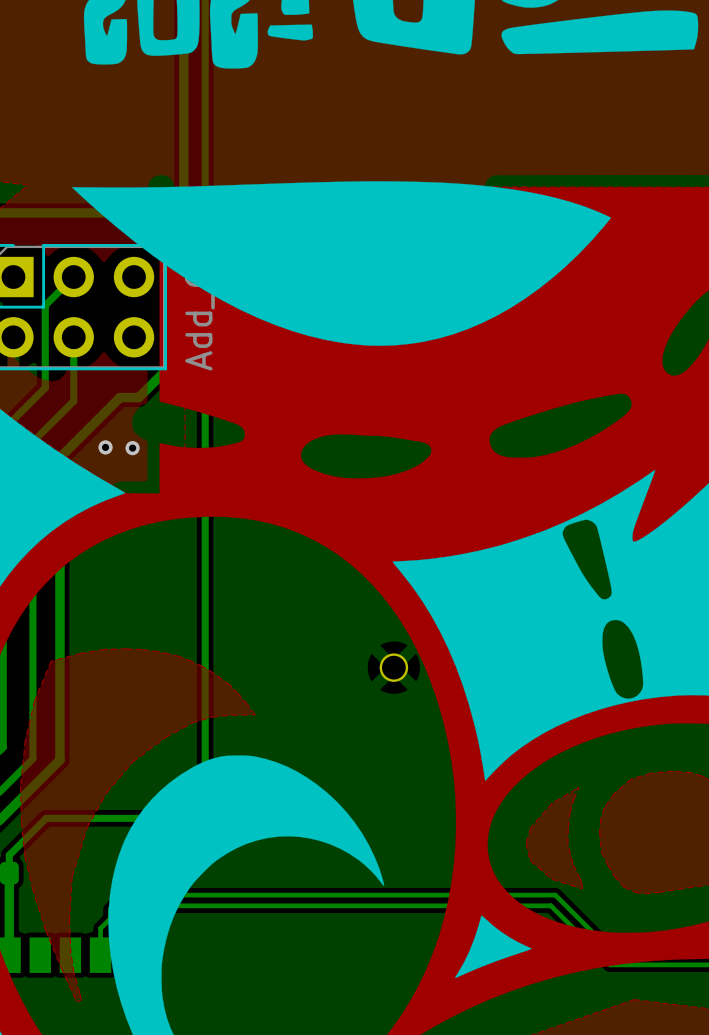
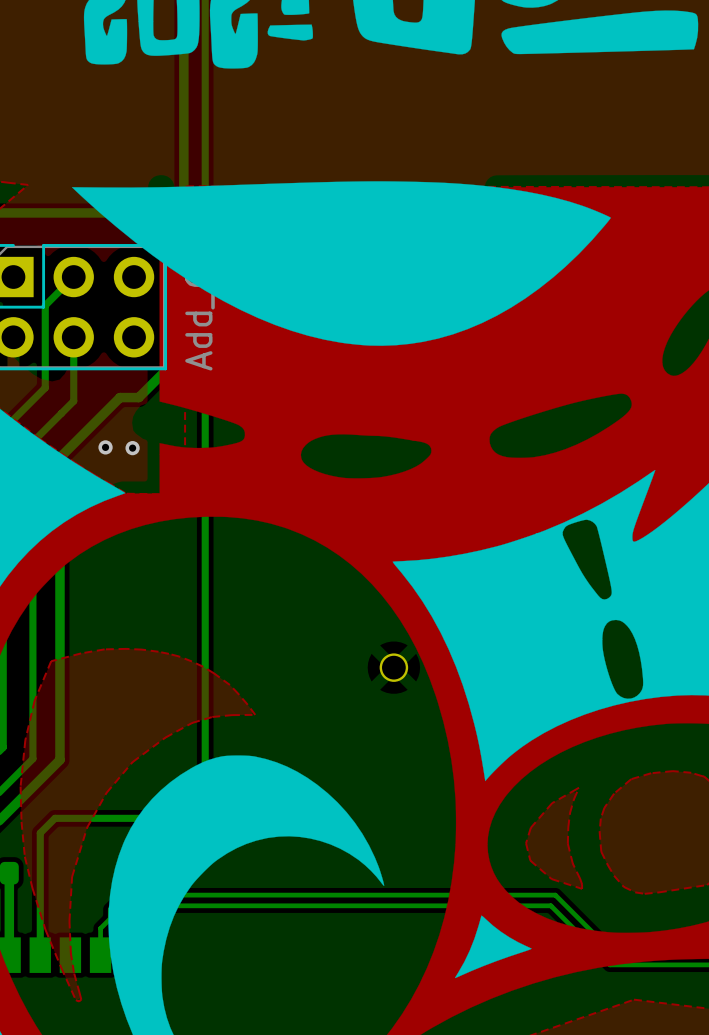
bottom track: (54, 818) (46, 818) (9, 855) (9, 873) -> (54, 818) (40, 833) (40, 955)

